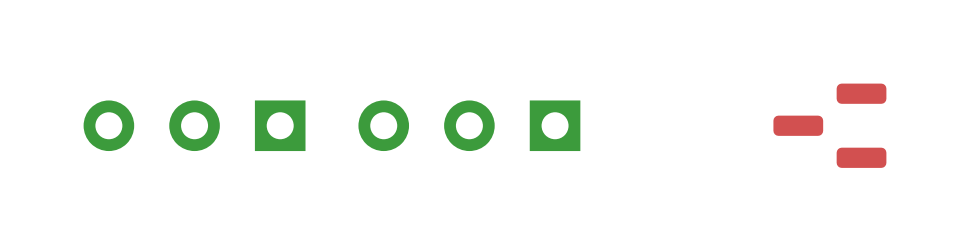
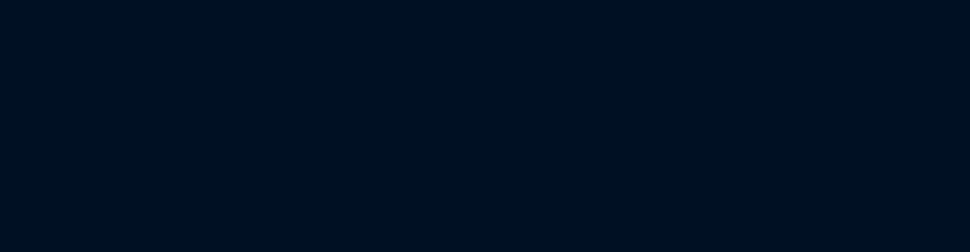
part: (194, 125) -> none
part: (469, 125) -> none
part: (829, 125) -> none

